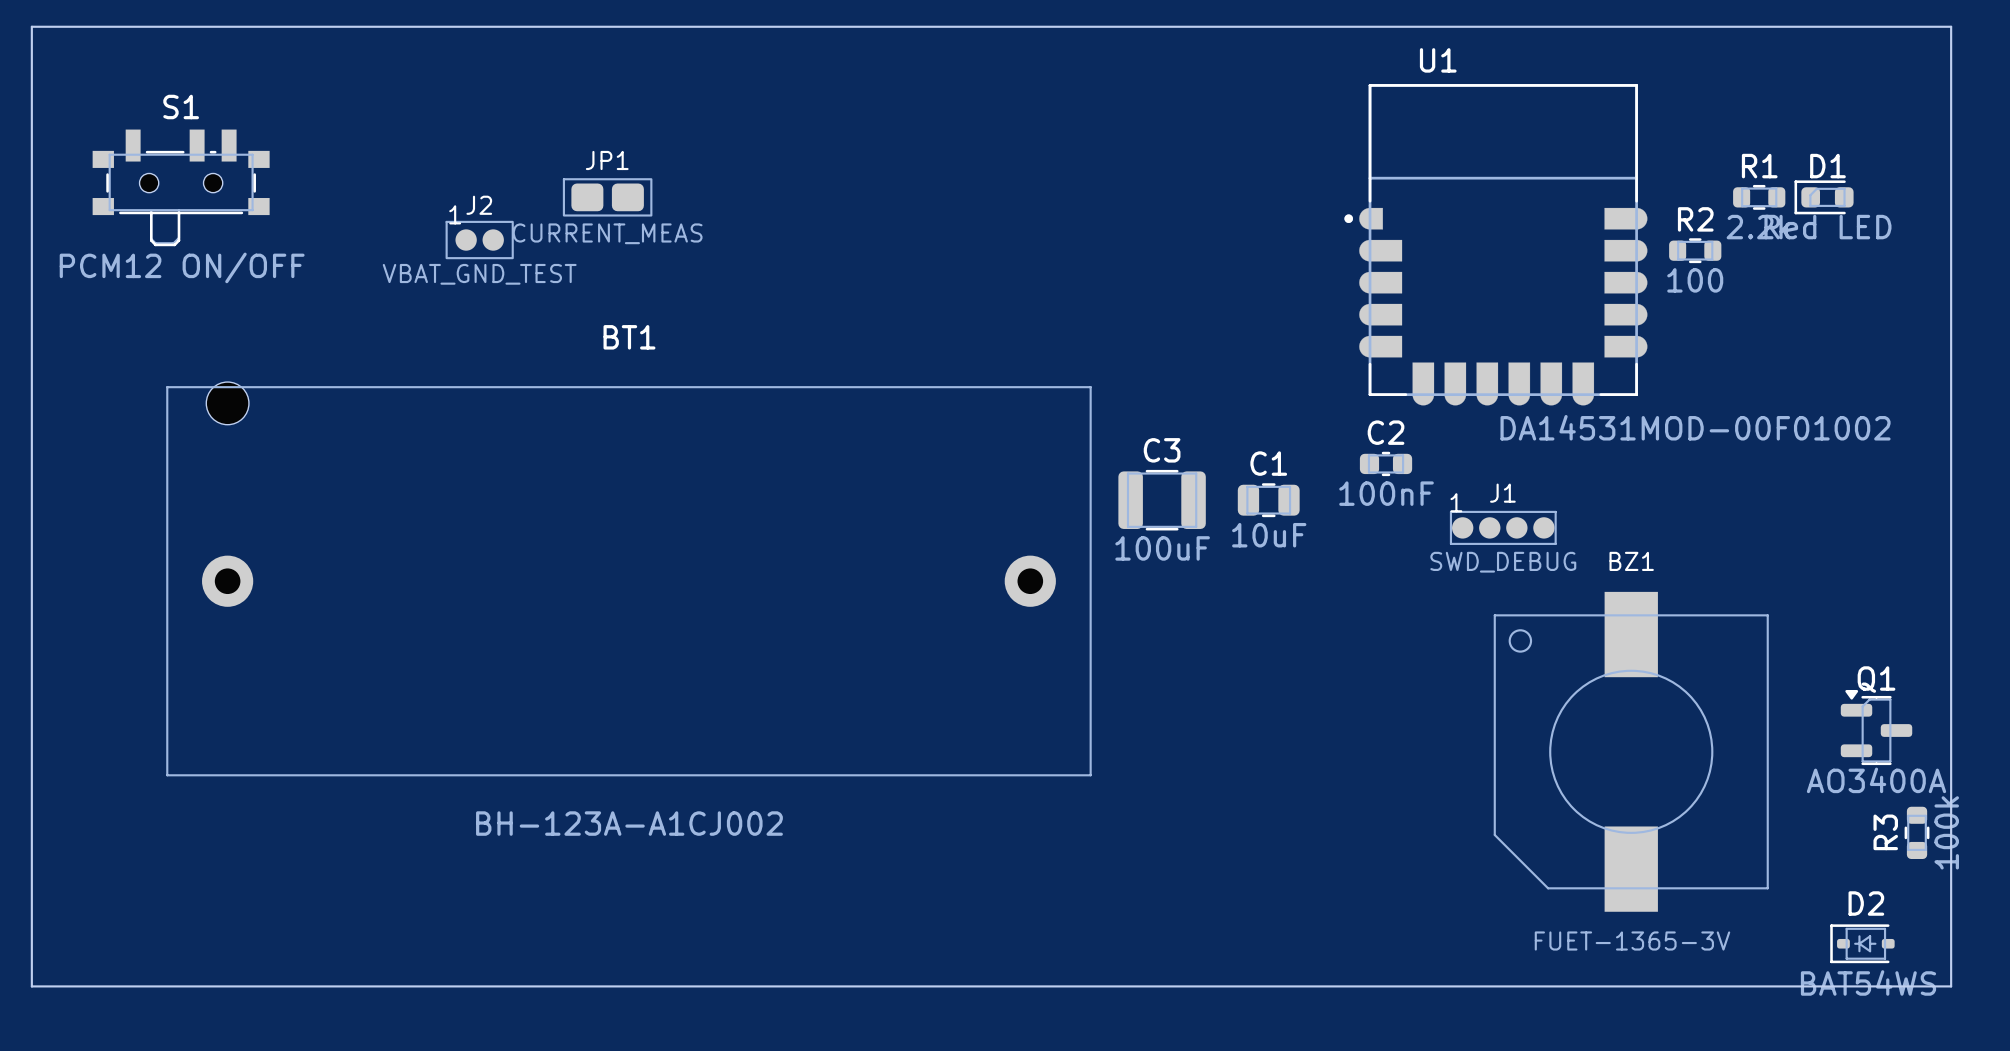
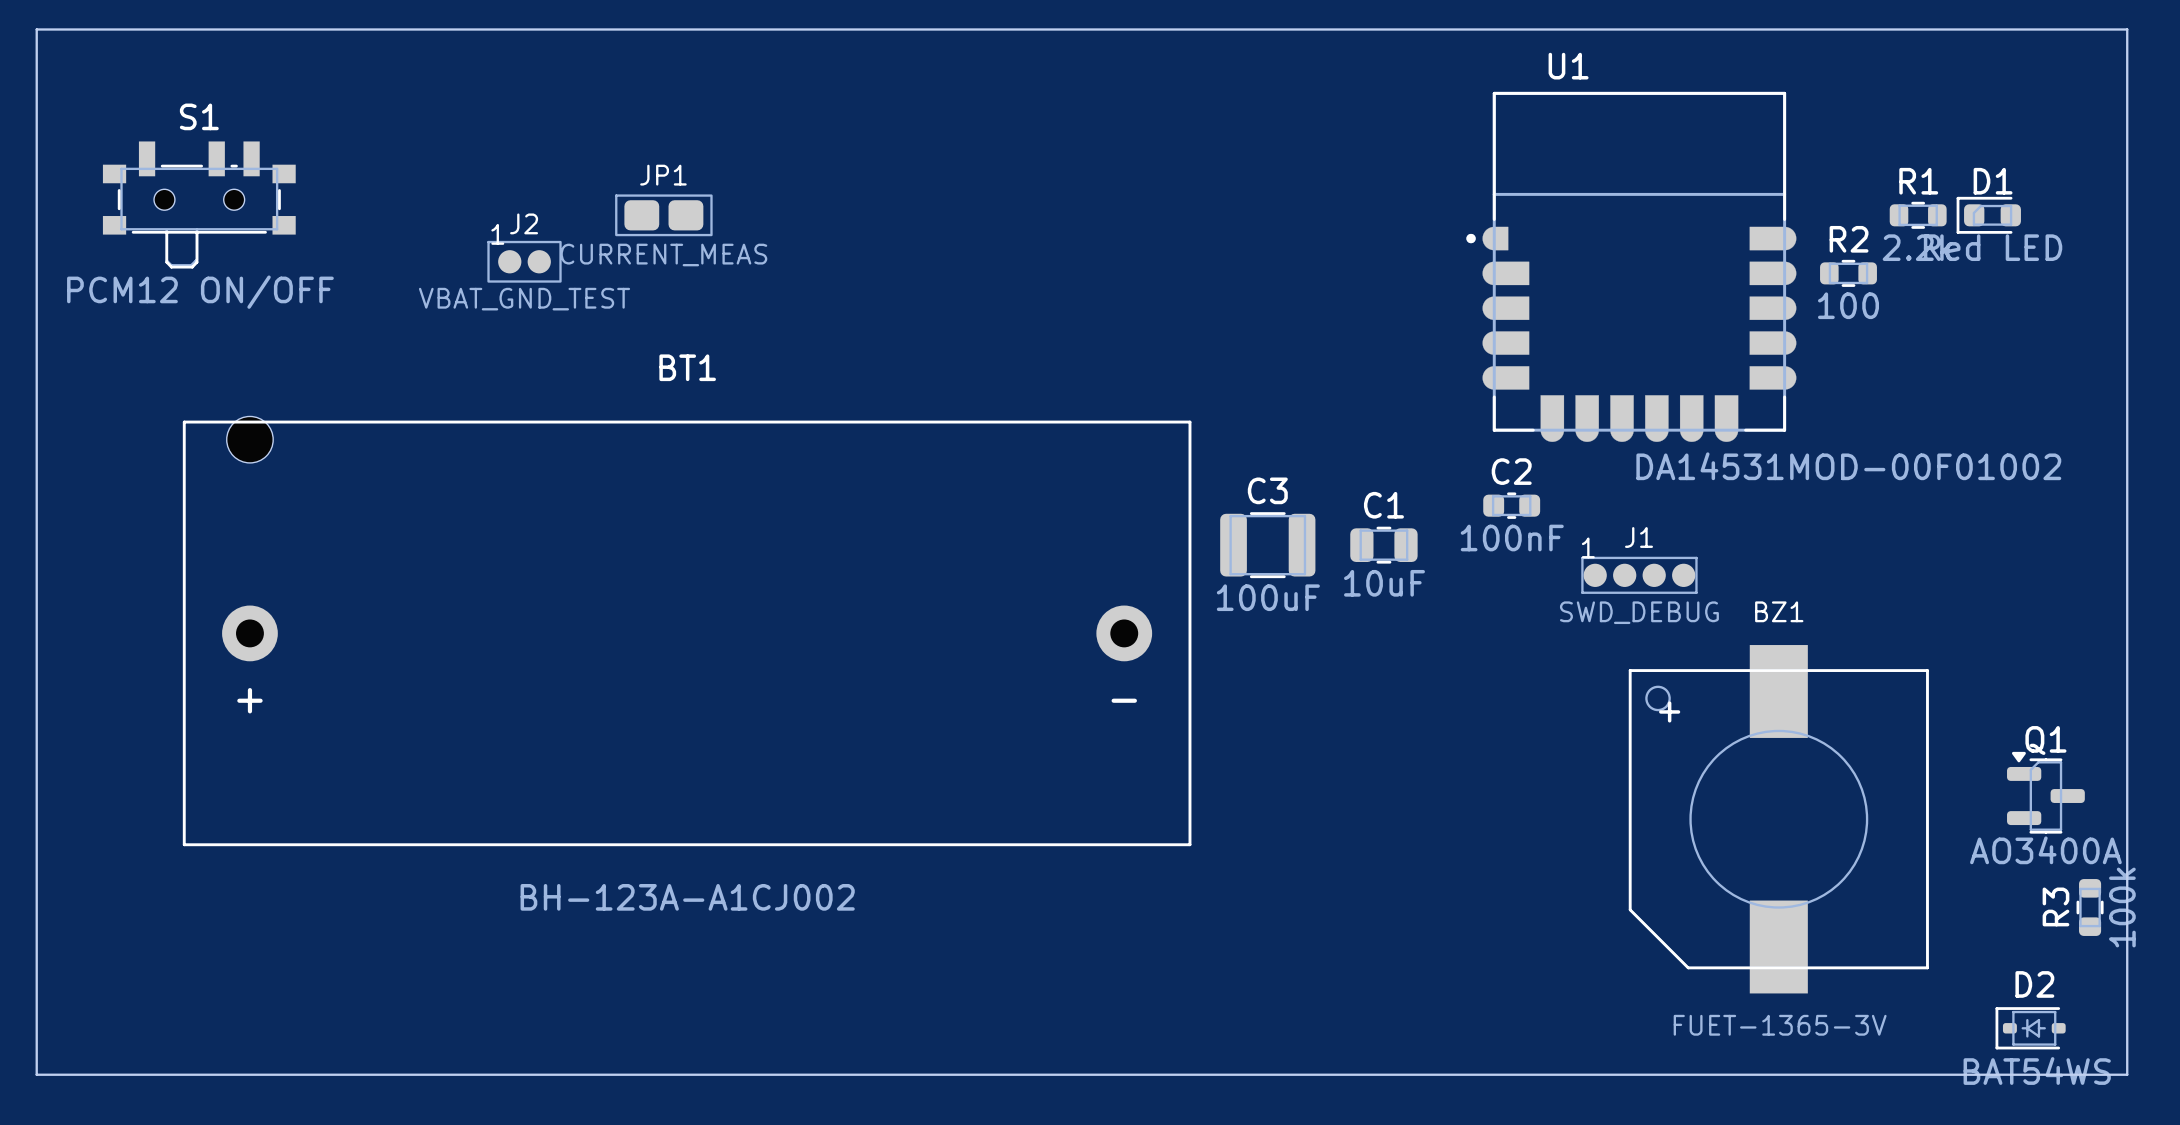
BT1 footprint: [166, 382, 1092, 777] -> [182, 416, 1192, 847]
BZ1 footprint: [1493, 591, 1769, 912] -> [1628, 645, 1929, 994]

